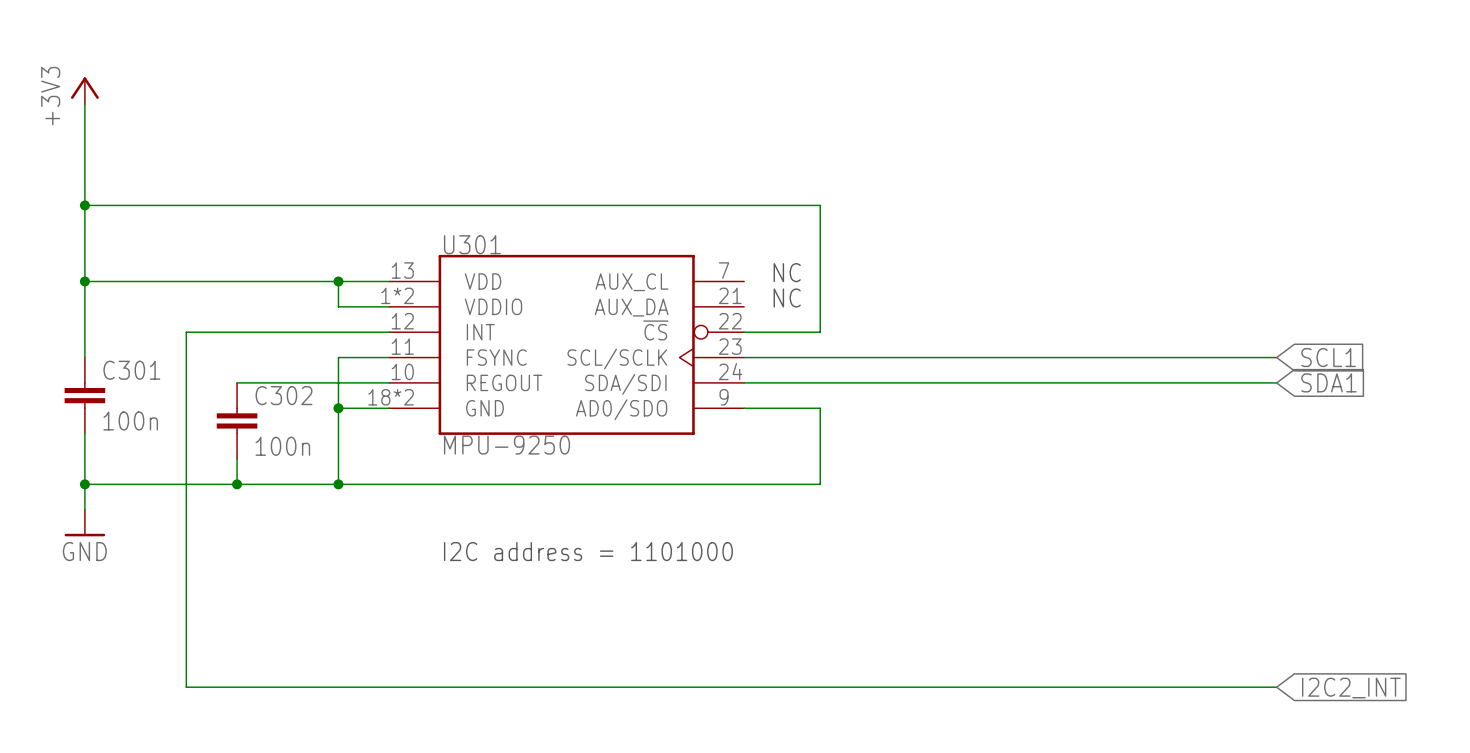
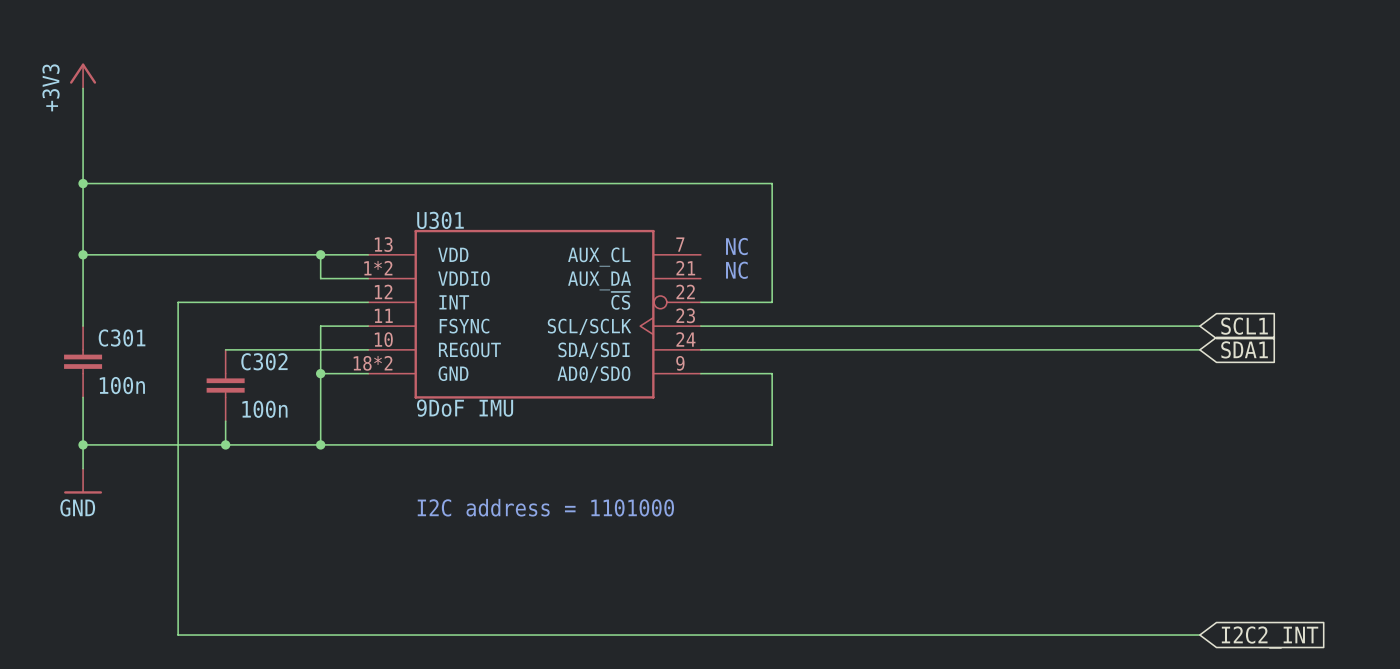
U301 value: MPU-9250 (507, 445) -> 9DoF IMU (465, 408)

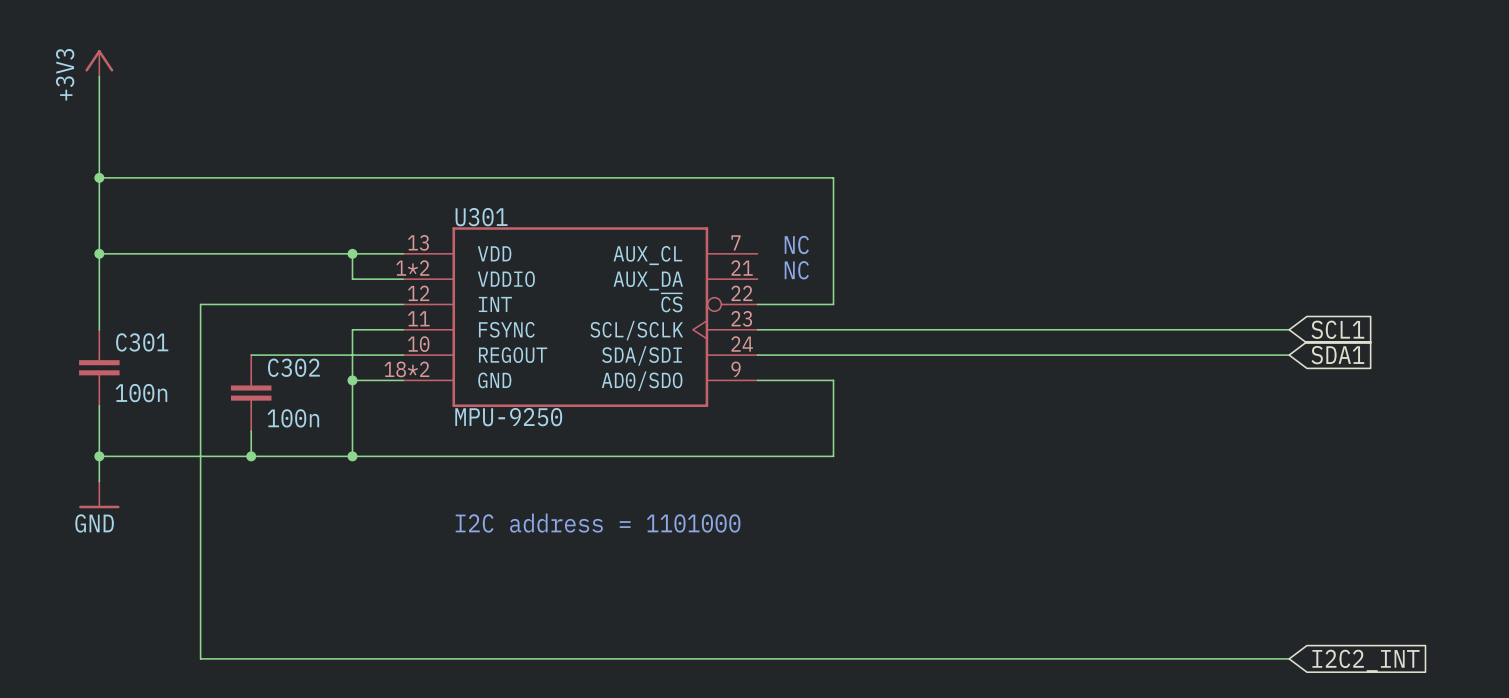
U301 value: 9DoF IMU (465, 408) -> MPU-9250 (508, 417)

